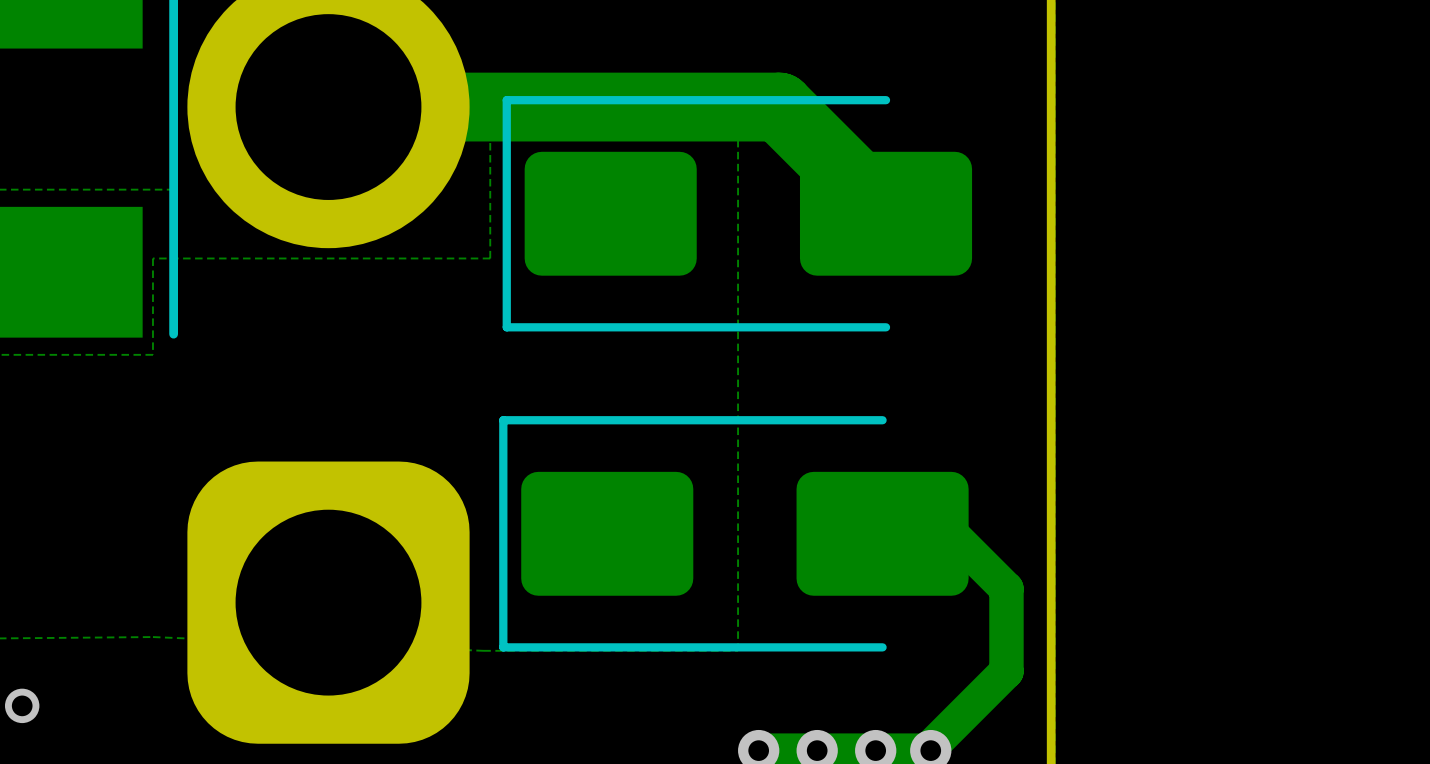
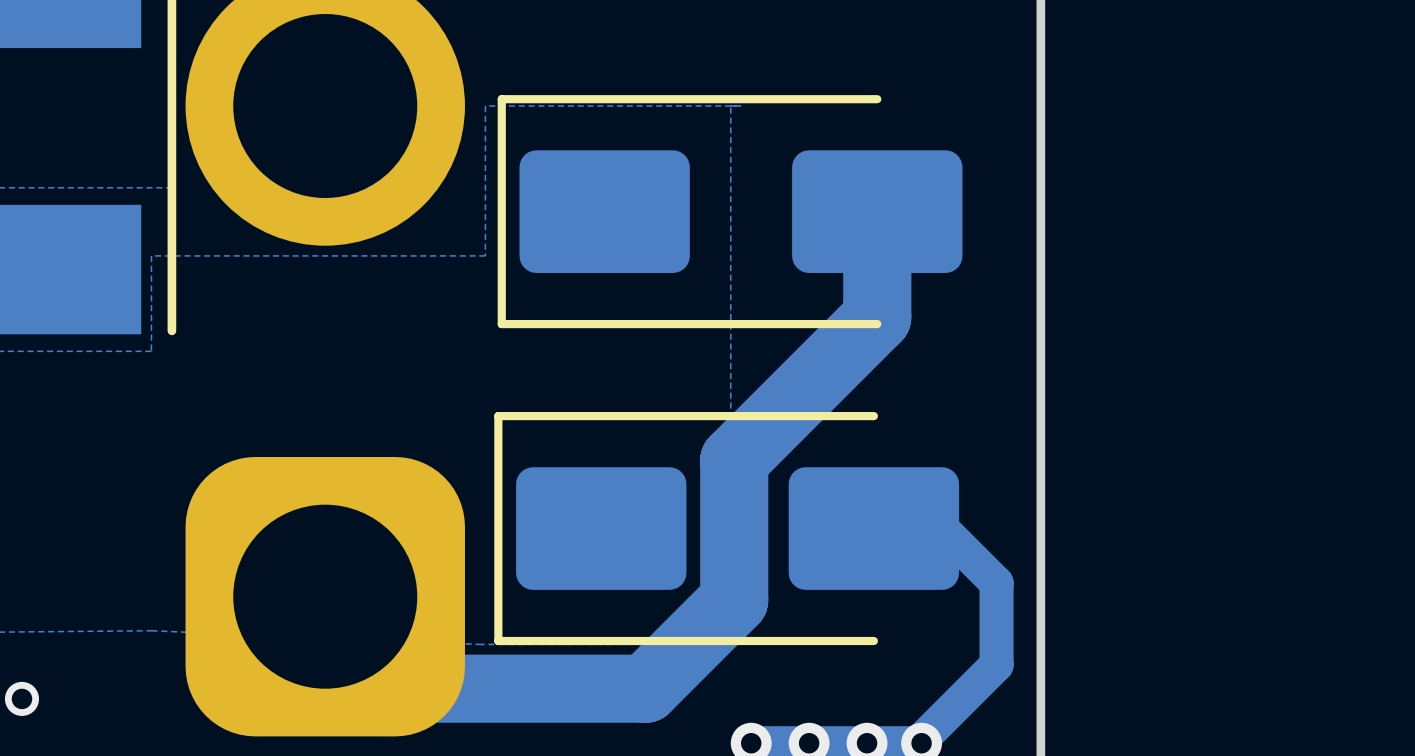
track: (328, 107) (779, 107) (886, 213) -> (417, 688) (645, 688) (734, 600) (734, 460) (877, 317) (877, 211)

